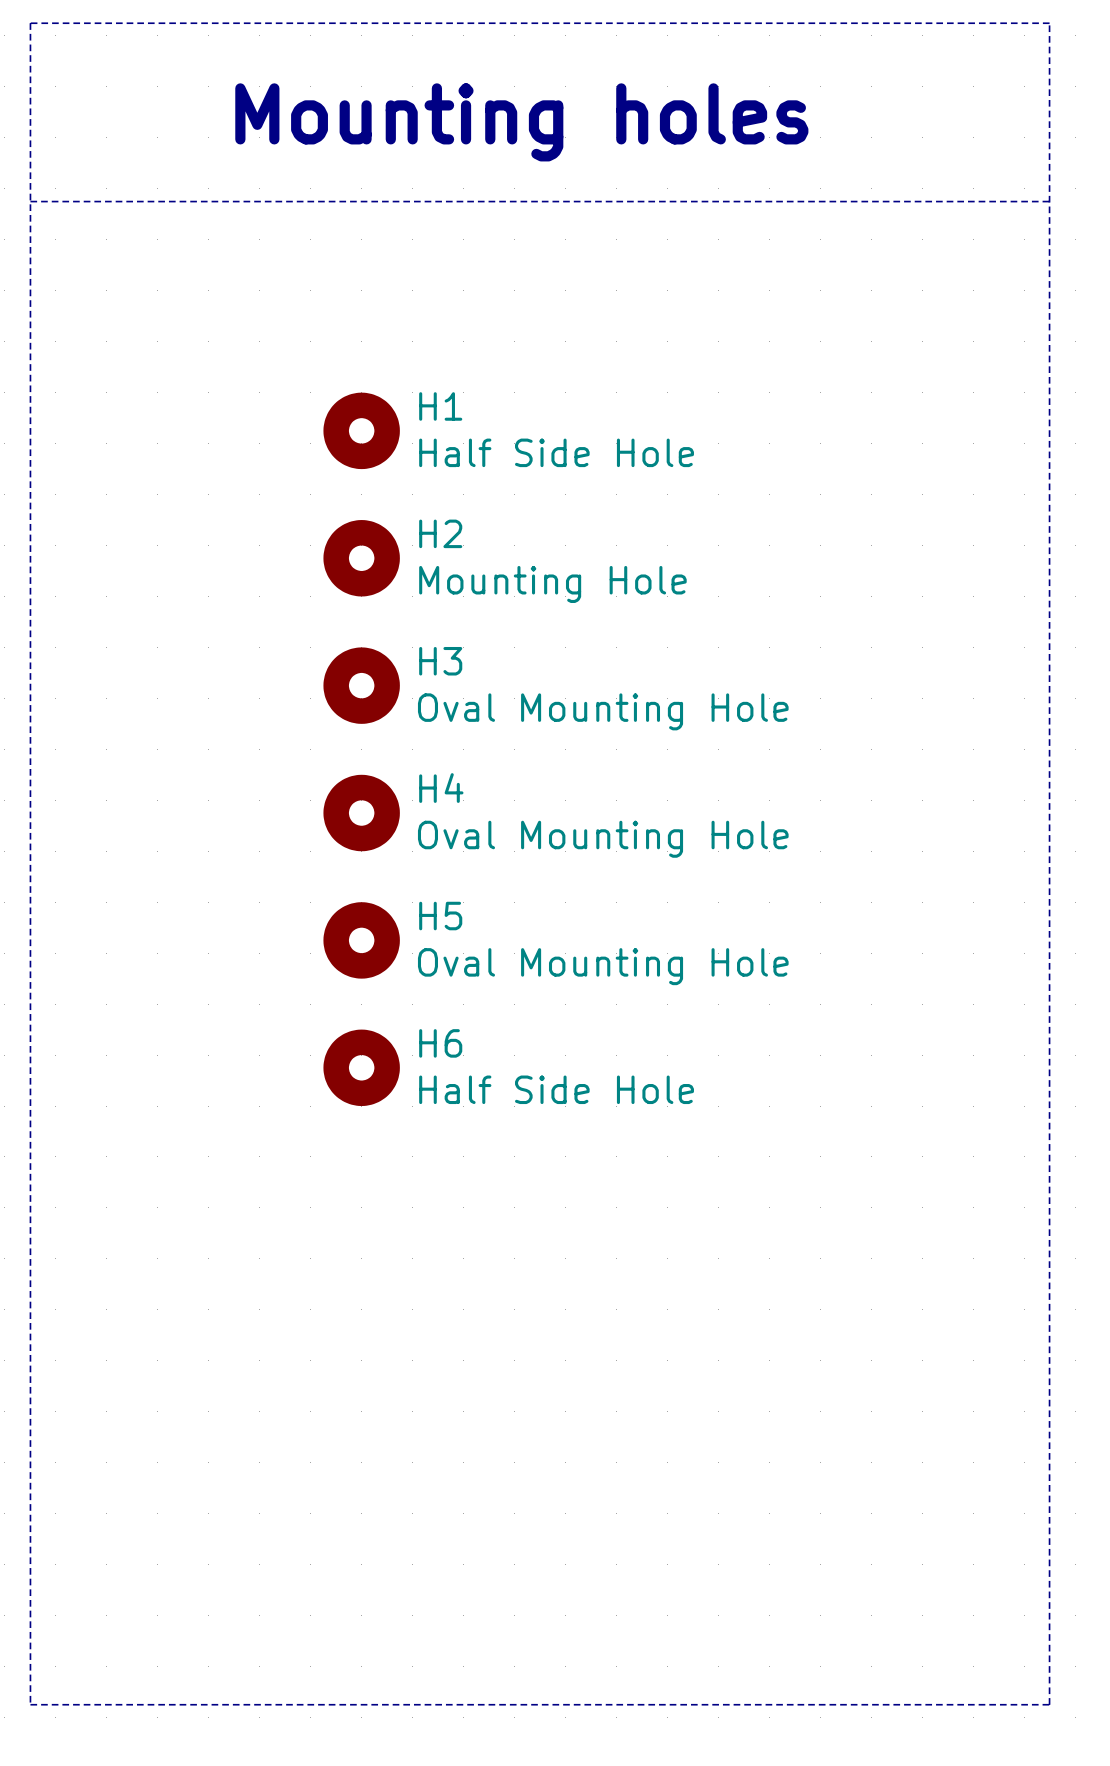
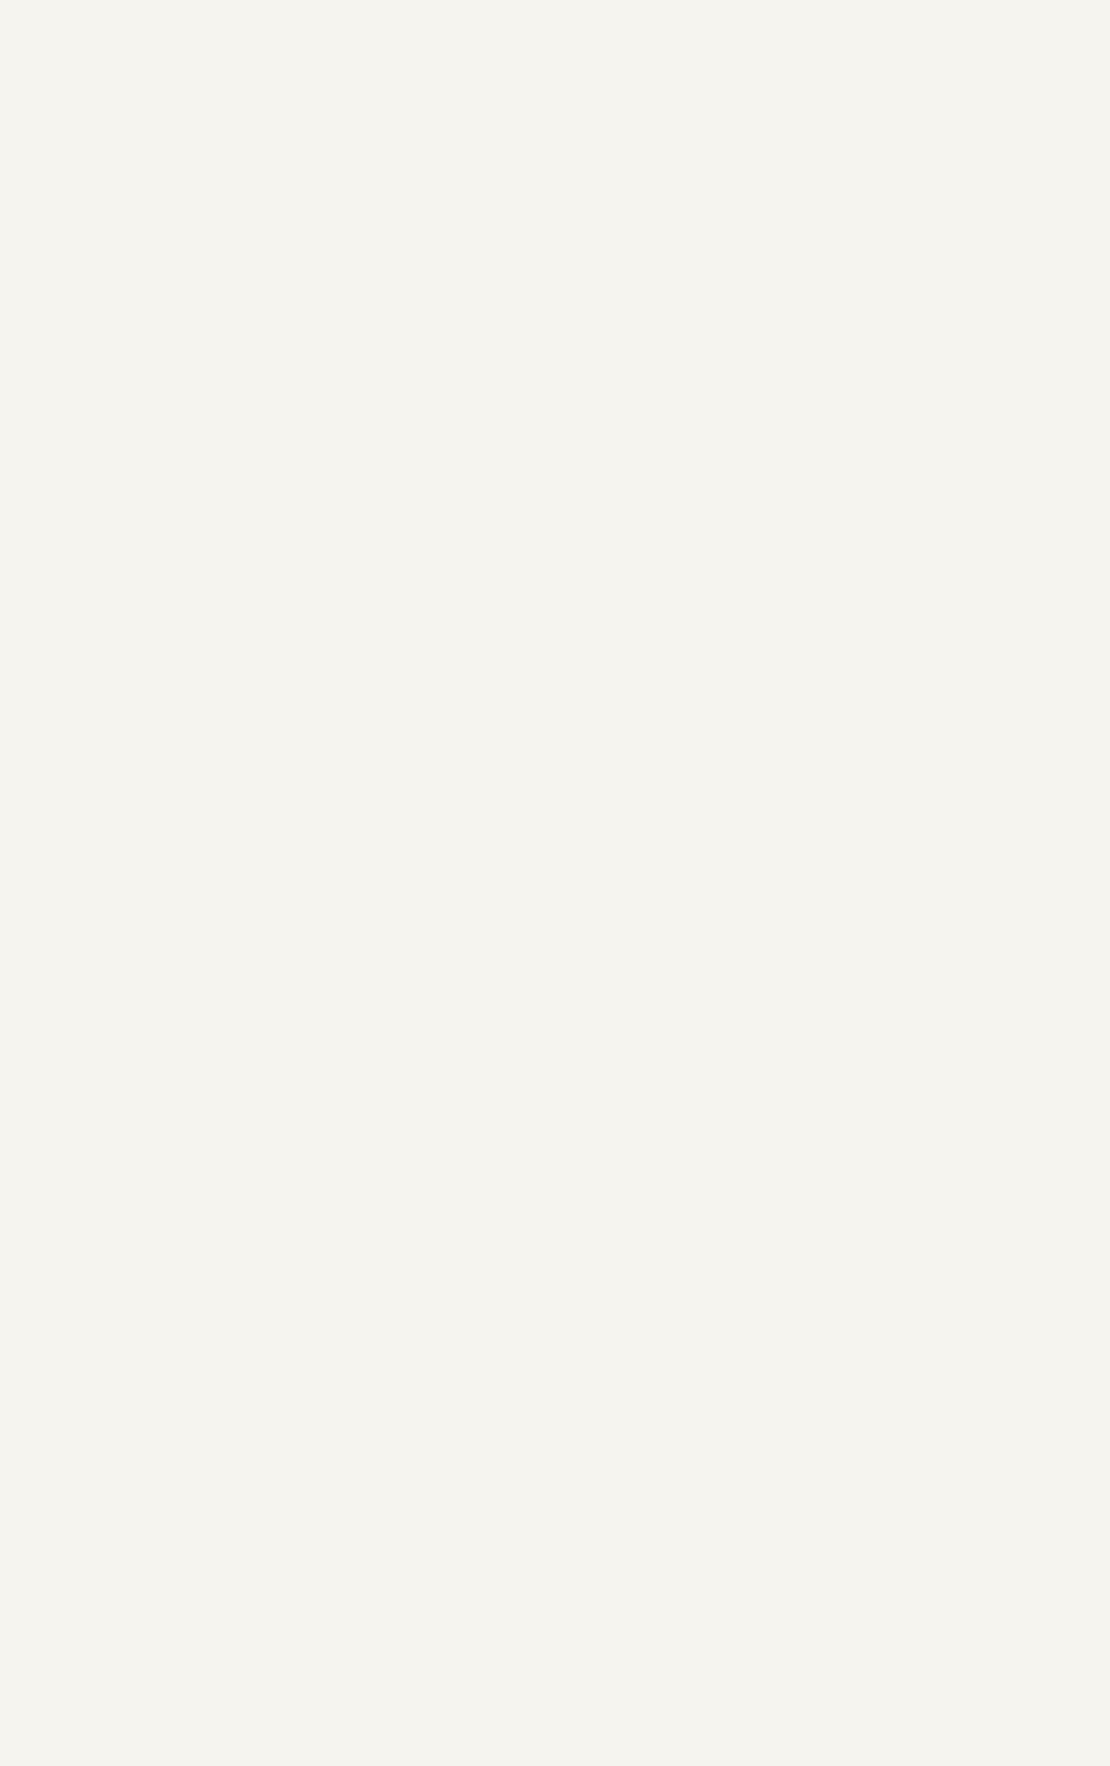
line: (30, 23) (1049, 23) (1049, 1704) (30, 1704) (30, 23) -> none
text: Mounting holes (521, 122) -> none
line: (30, 201) (1049, 201) -> none
H1: Half Side Hole (361, 430) -> none
H2: Mounting Hole (361, 558) -> none
H3: Oval Mounting Hole (361, 685) -> none
H4: Oval Mounting Hole (361, 813) -> none
H5: Oval Mounting Hole (361, 940) -> none
H6: Half Side Hole (361, 1067) -> none

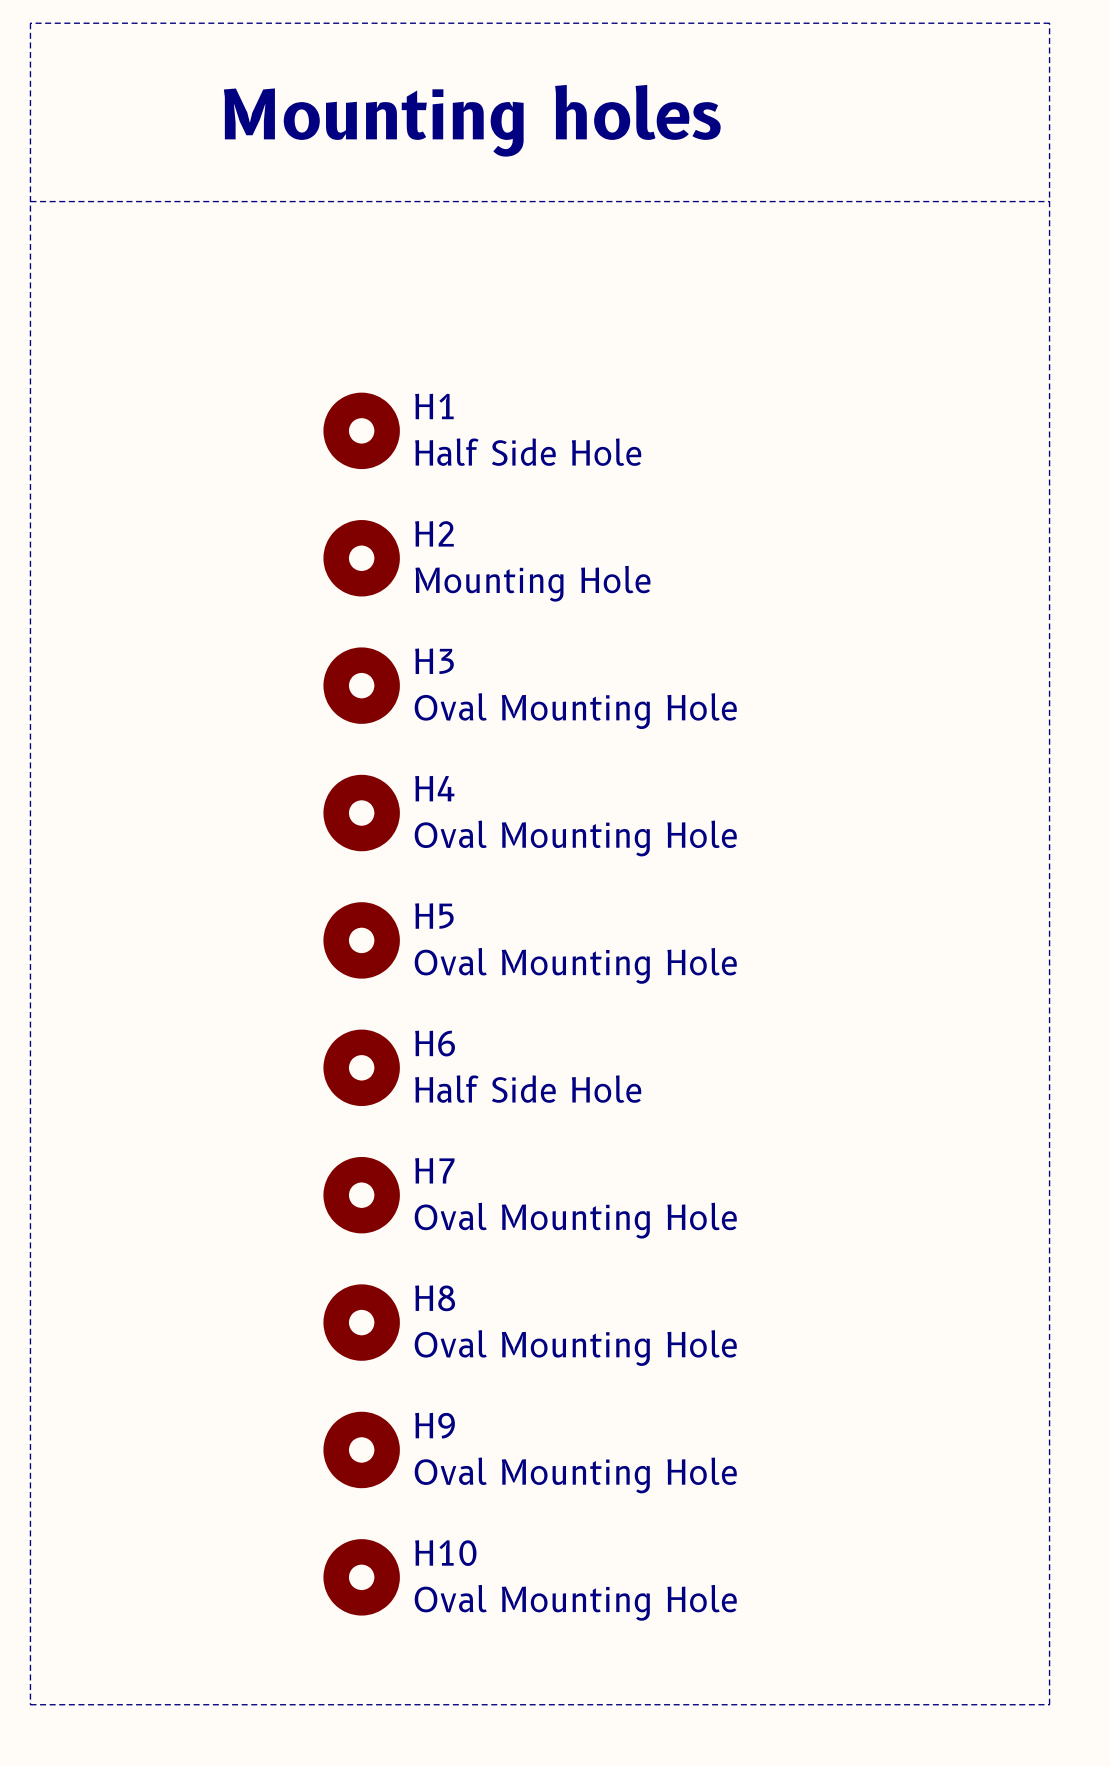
line: none -> (30, 23) (1049, 23) (1049, 1704) (30, 1704) (30, 23)
text: none -> Mounting holes (472, 120)
line: none -> (30, 201) (1049, 201)
H1: none -> Half Side Hole (361, 430)
H2: none -> Mounting Hole (361, 558)
H3: none -> Oval Mounting Hole (361, 685)
H4: none -> Oval Mounting Hole (361, 813)
H5: none -> Oval Mounting Hole (361, 940)
H6: none -> Half Side Hole (361, 1067)
H7: none -> Oval Mounting Hole (361, 1195)
H8: none -> Oval Mounting Hole (361, 1322)
H9: none -> Oval Mounting Hole (361, 1449)
H10: none -> Oval Mounting Hole (361, 1577)

